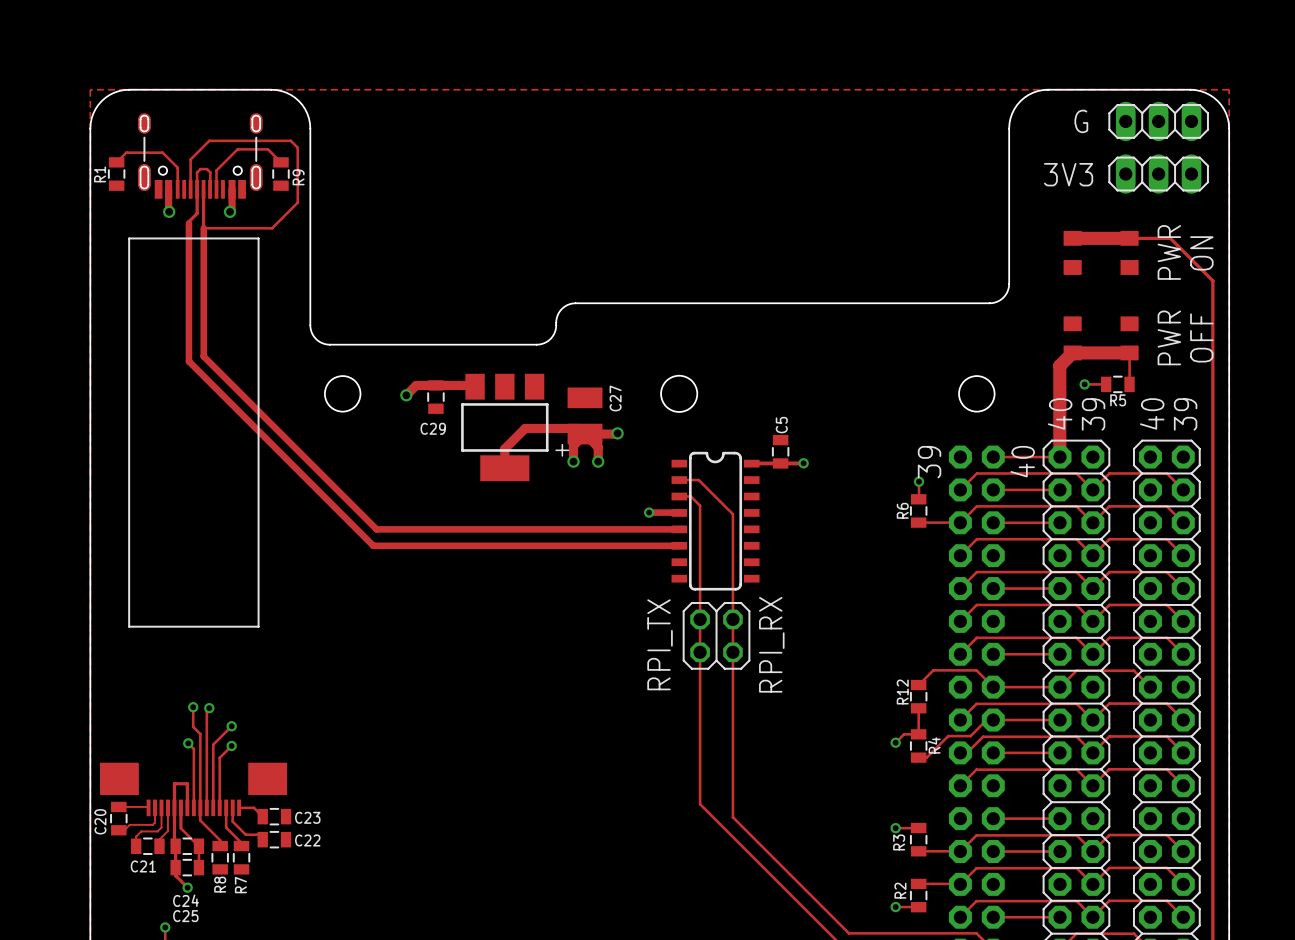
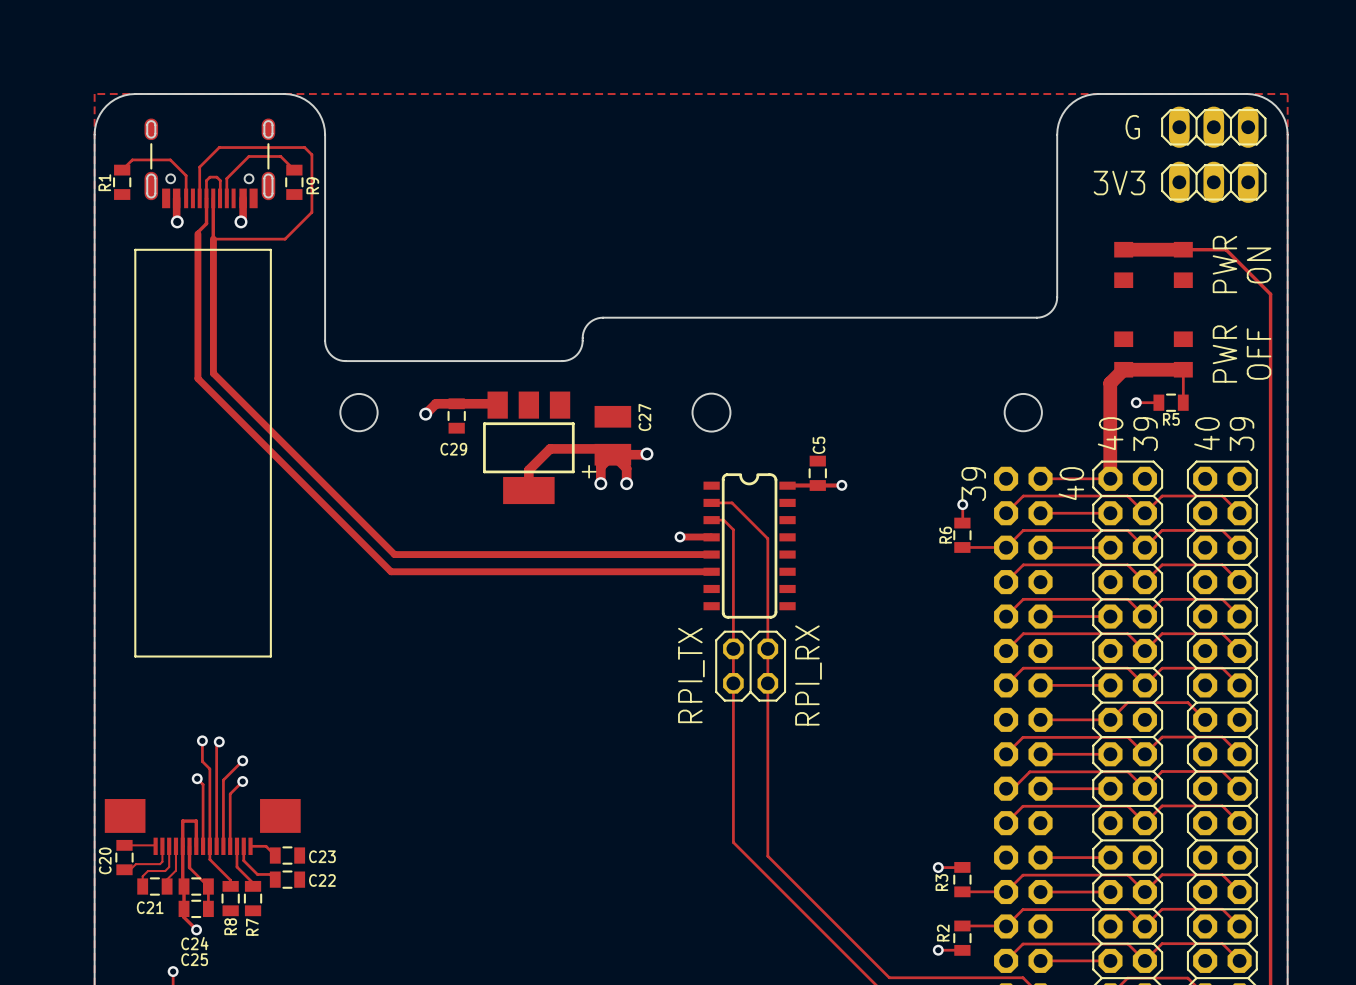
track: (918, 685) (933, 670) (976, 670) (993, 687) -> none
R12: (918, 696) -> none
track: (918, 708) (918, 734) (904, 734) (895, 742) -> none
track: (993, 720) (986, 720) (970, 736) (948, 736) (926, 757) (918, 757) -> none
via: (895, 742) -> none
R4: (918, 745) -> none

